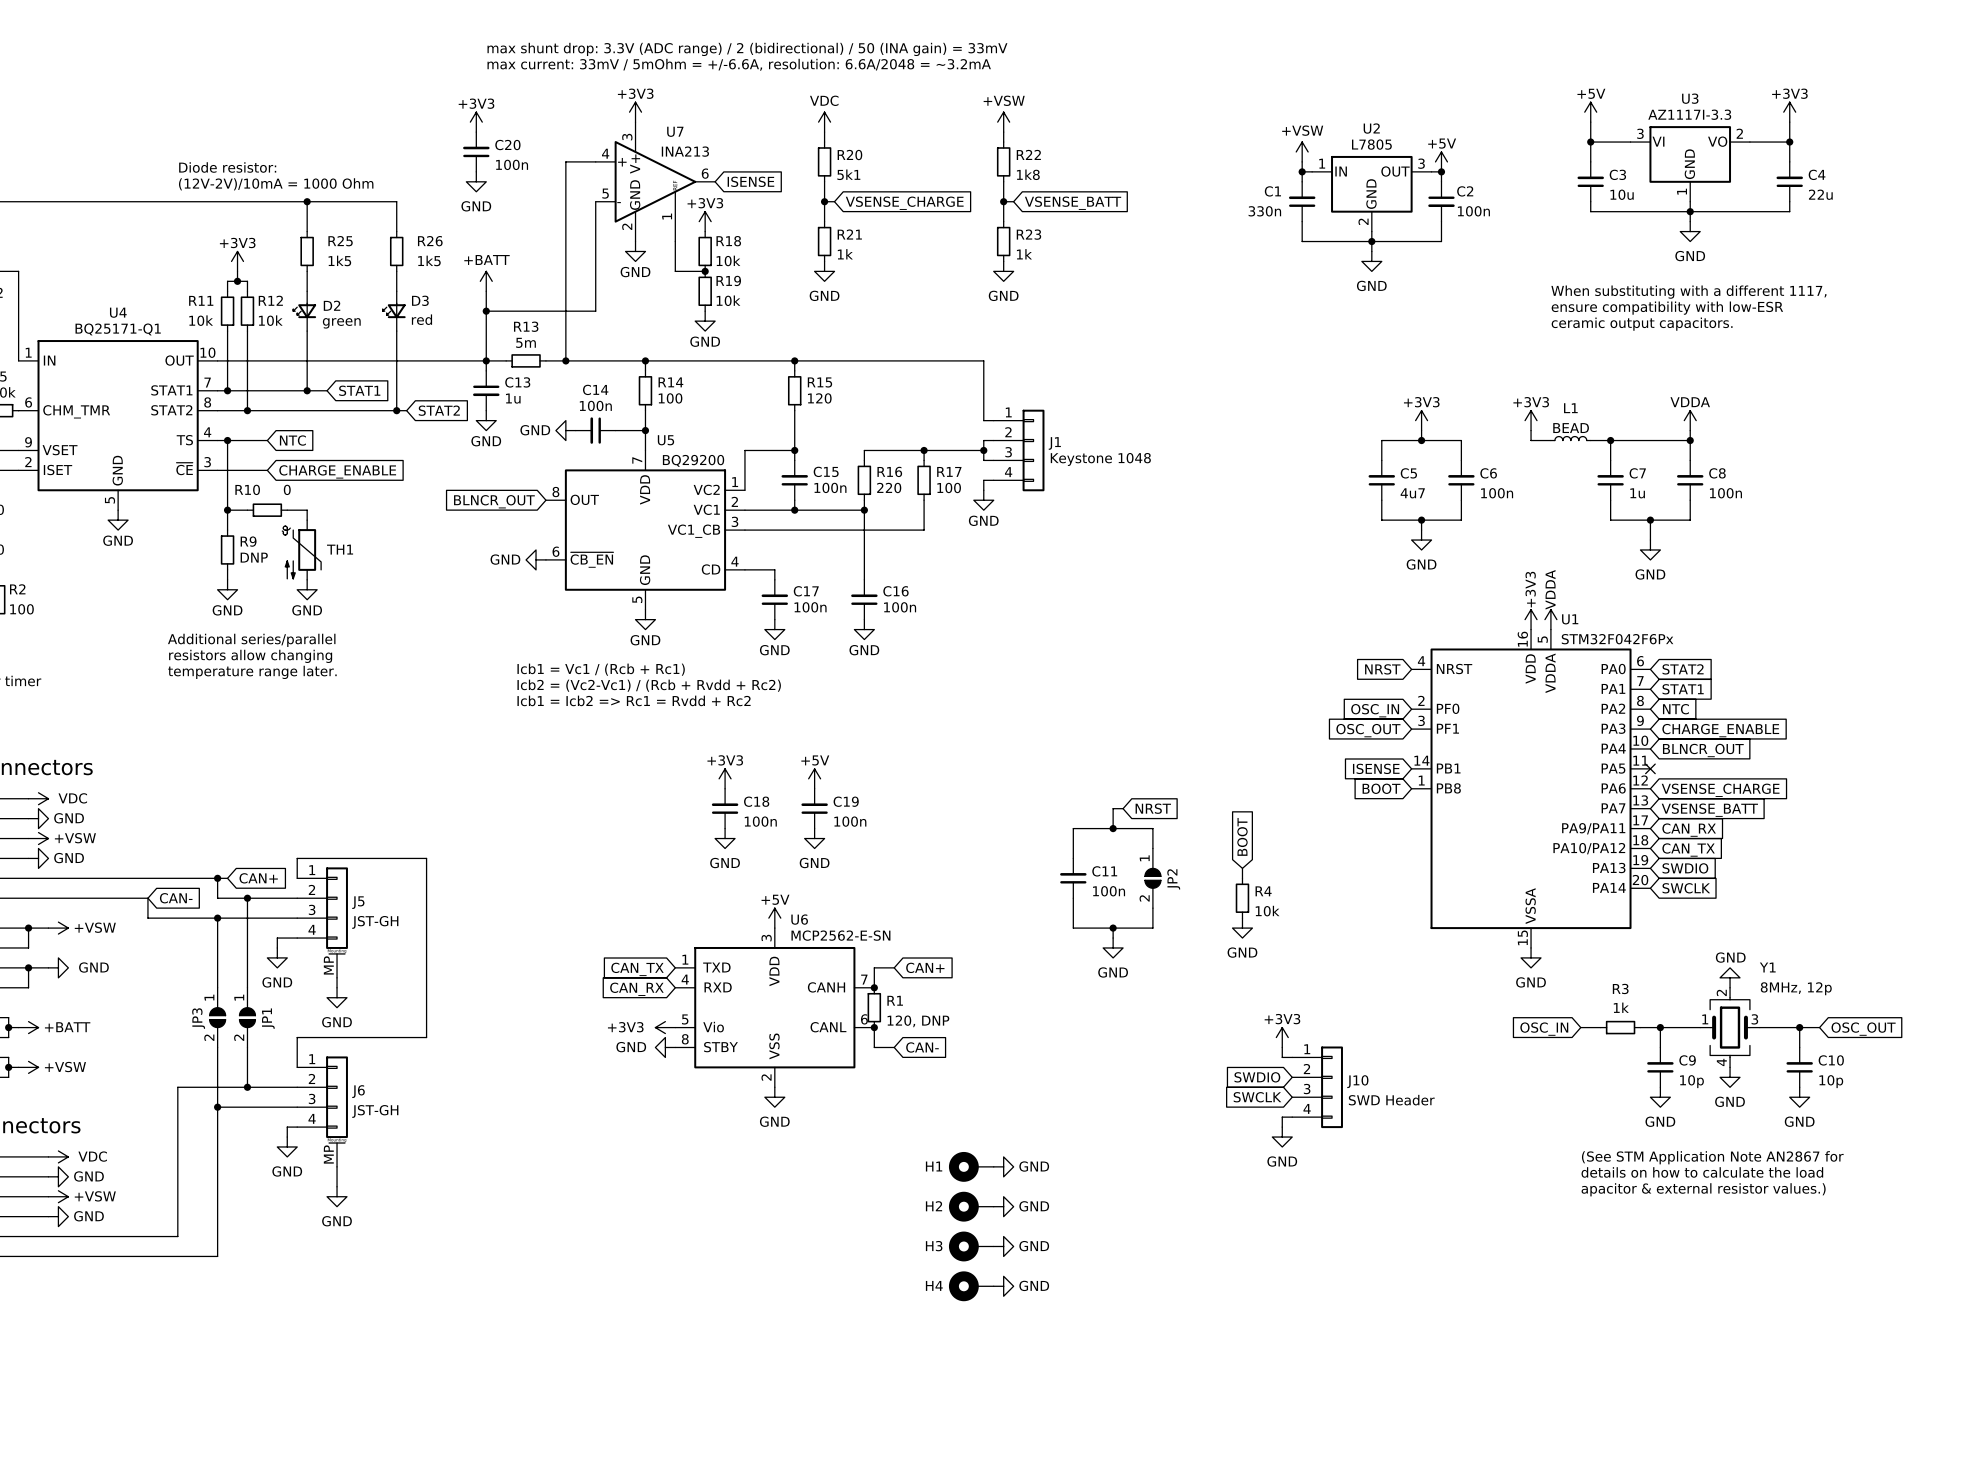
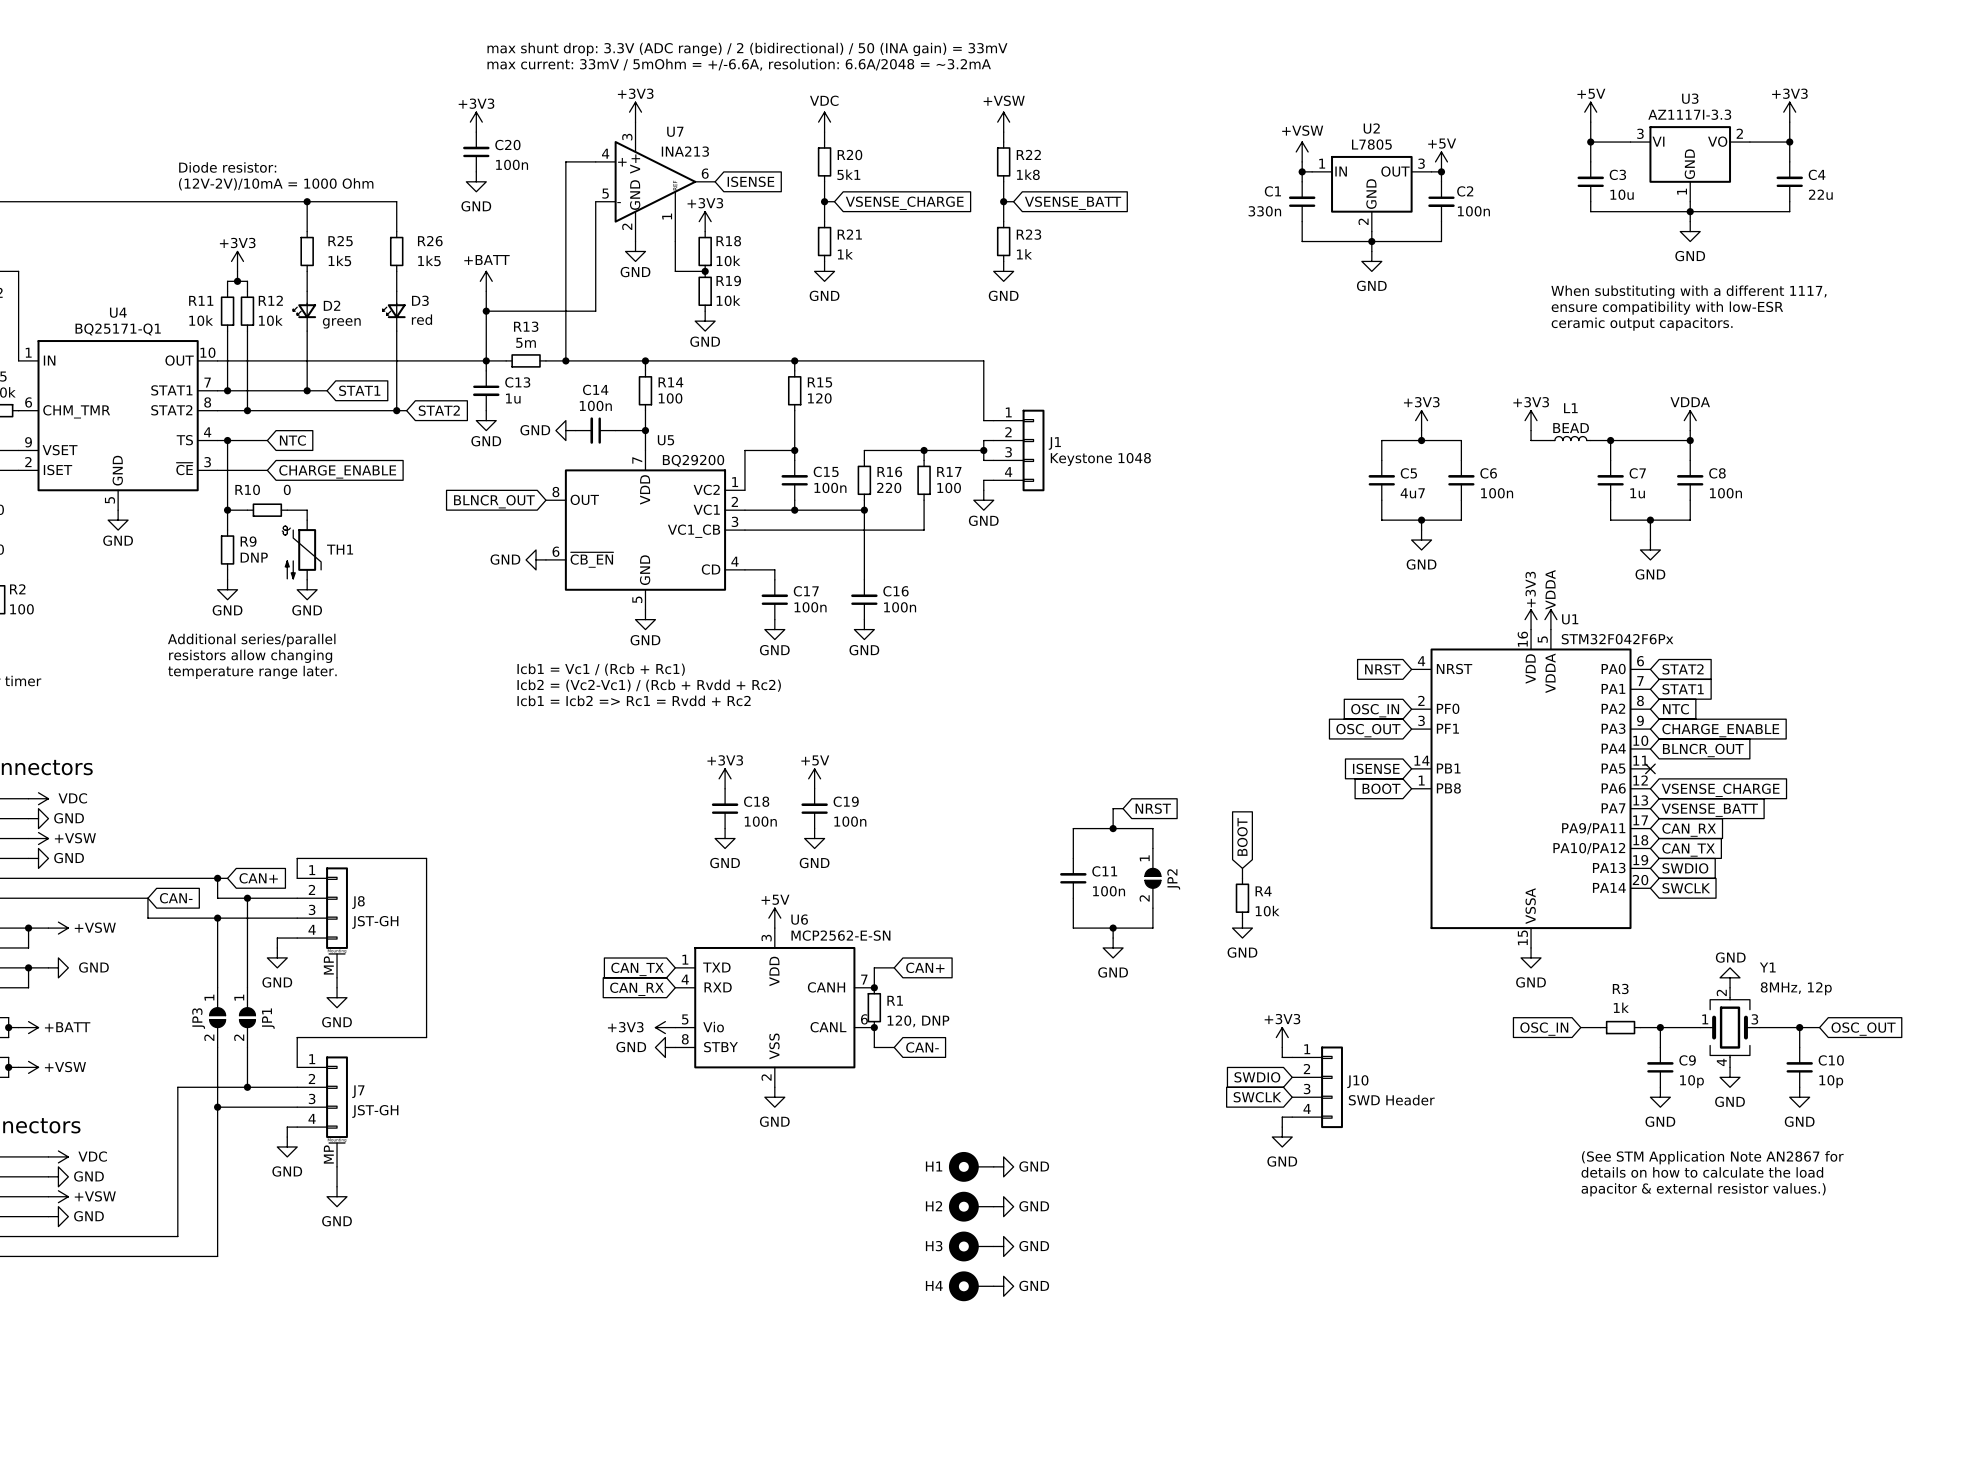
J5 name: J5 (358, 902) -> J8 (358, 902)
J6 name: J6 (358, 1091) -> J7 (358, 1091)

